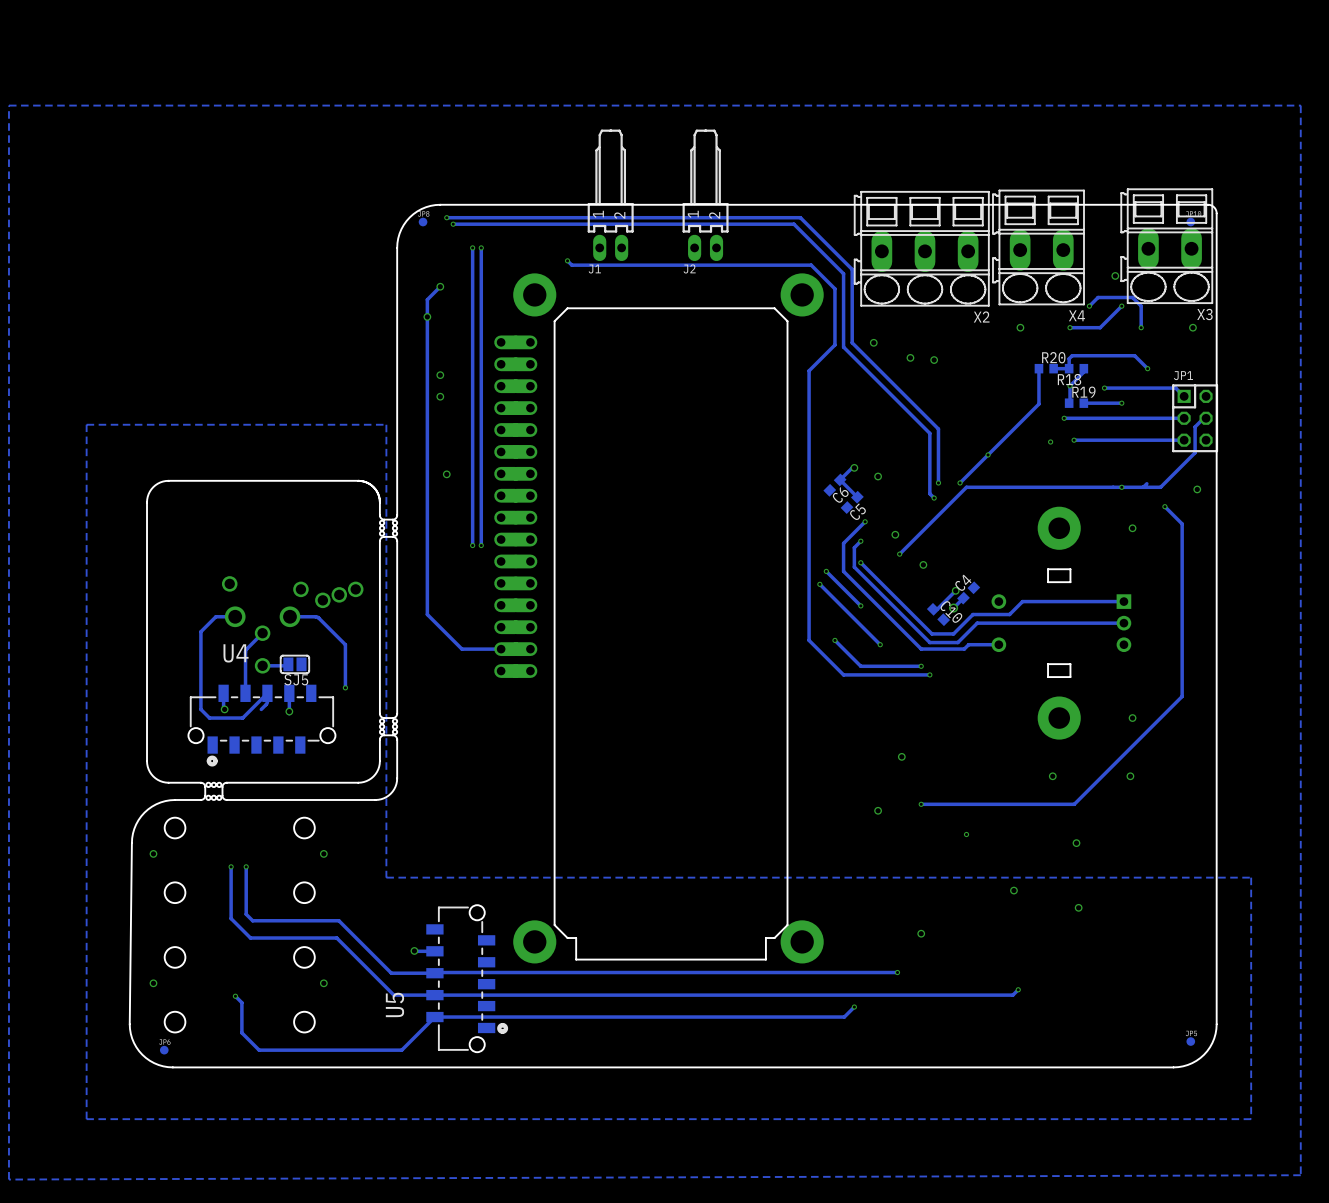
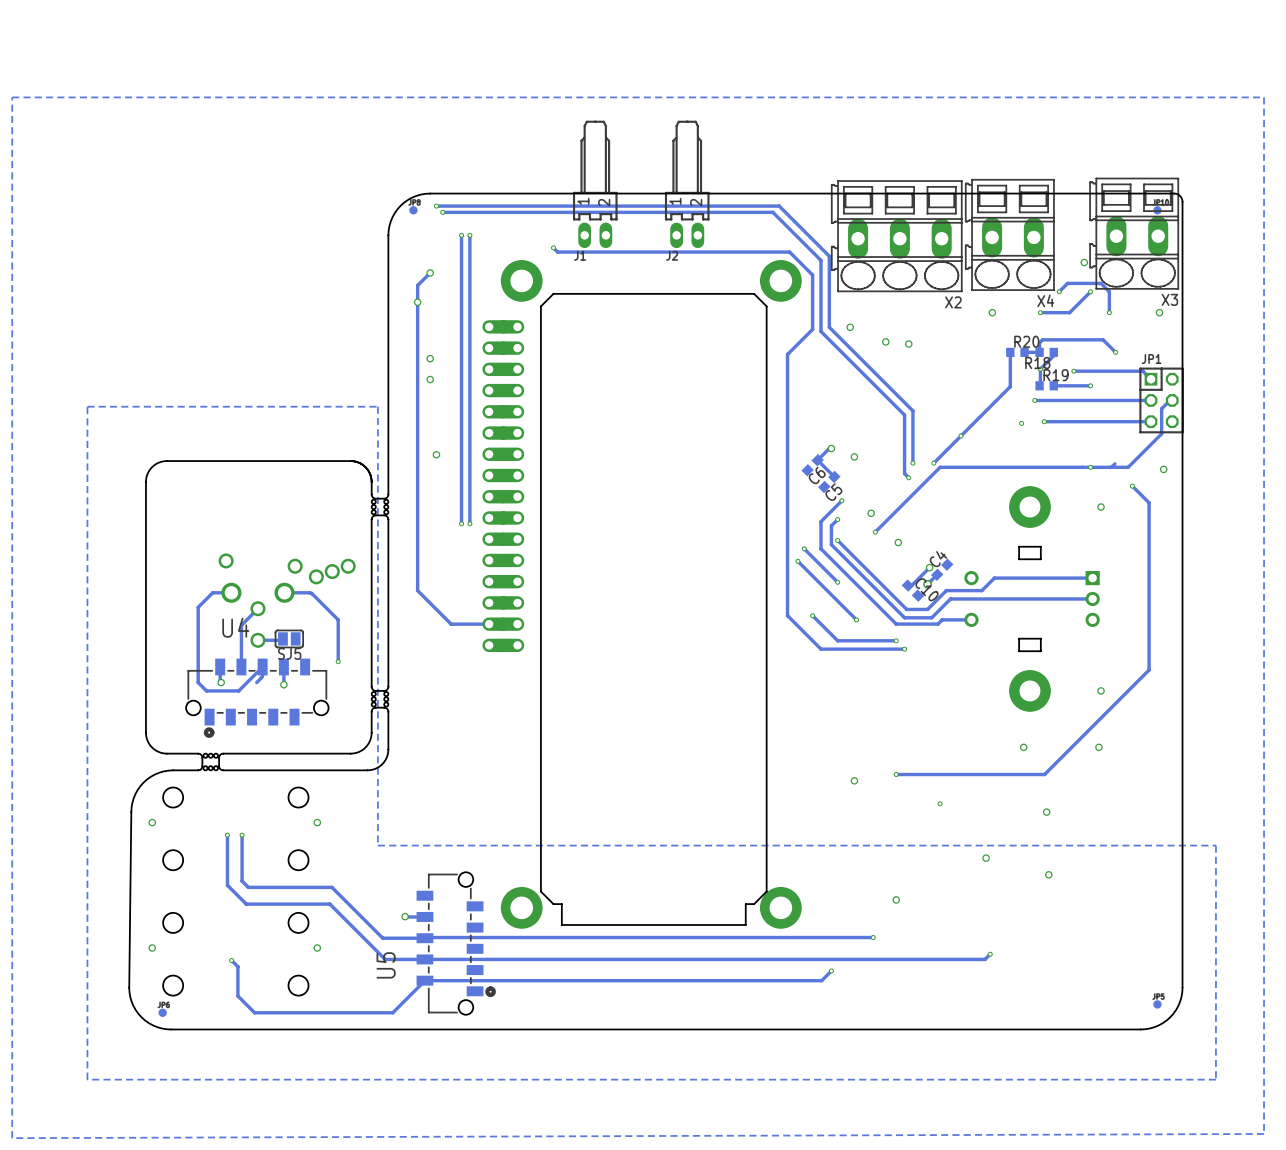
via: (901, 756) -> none

